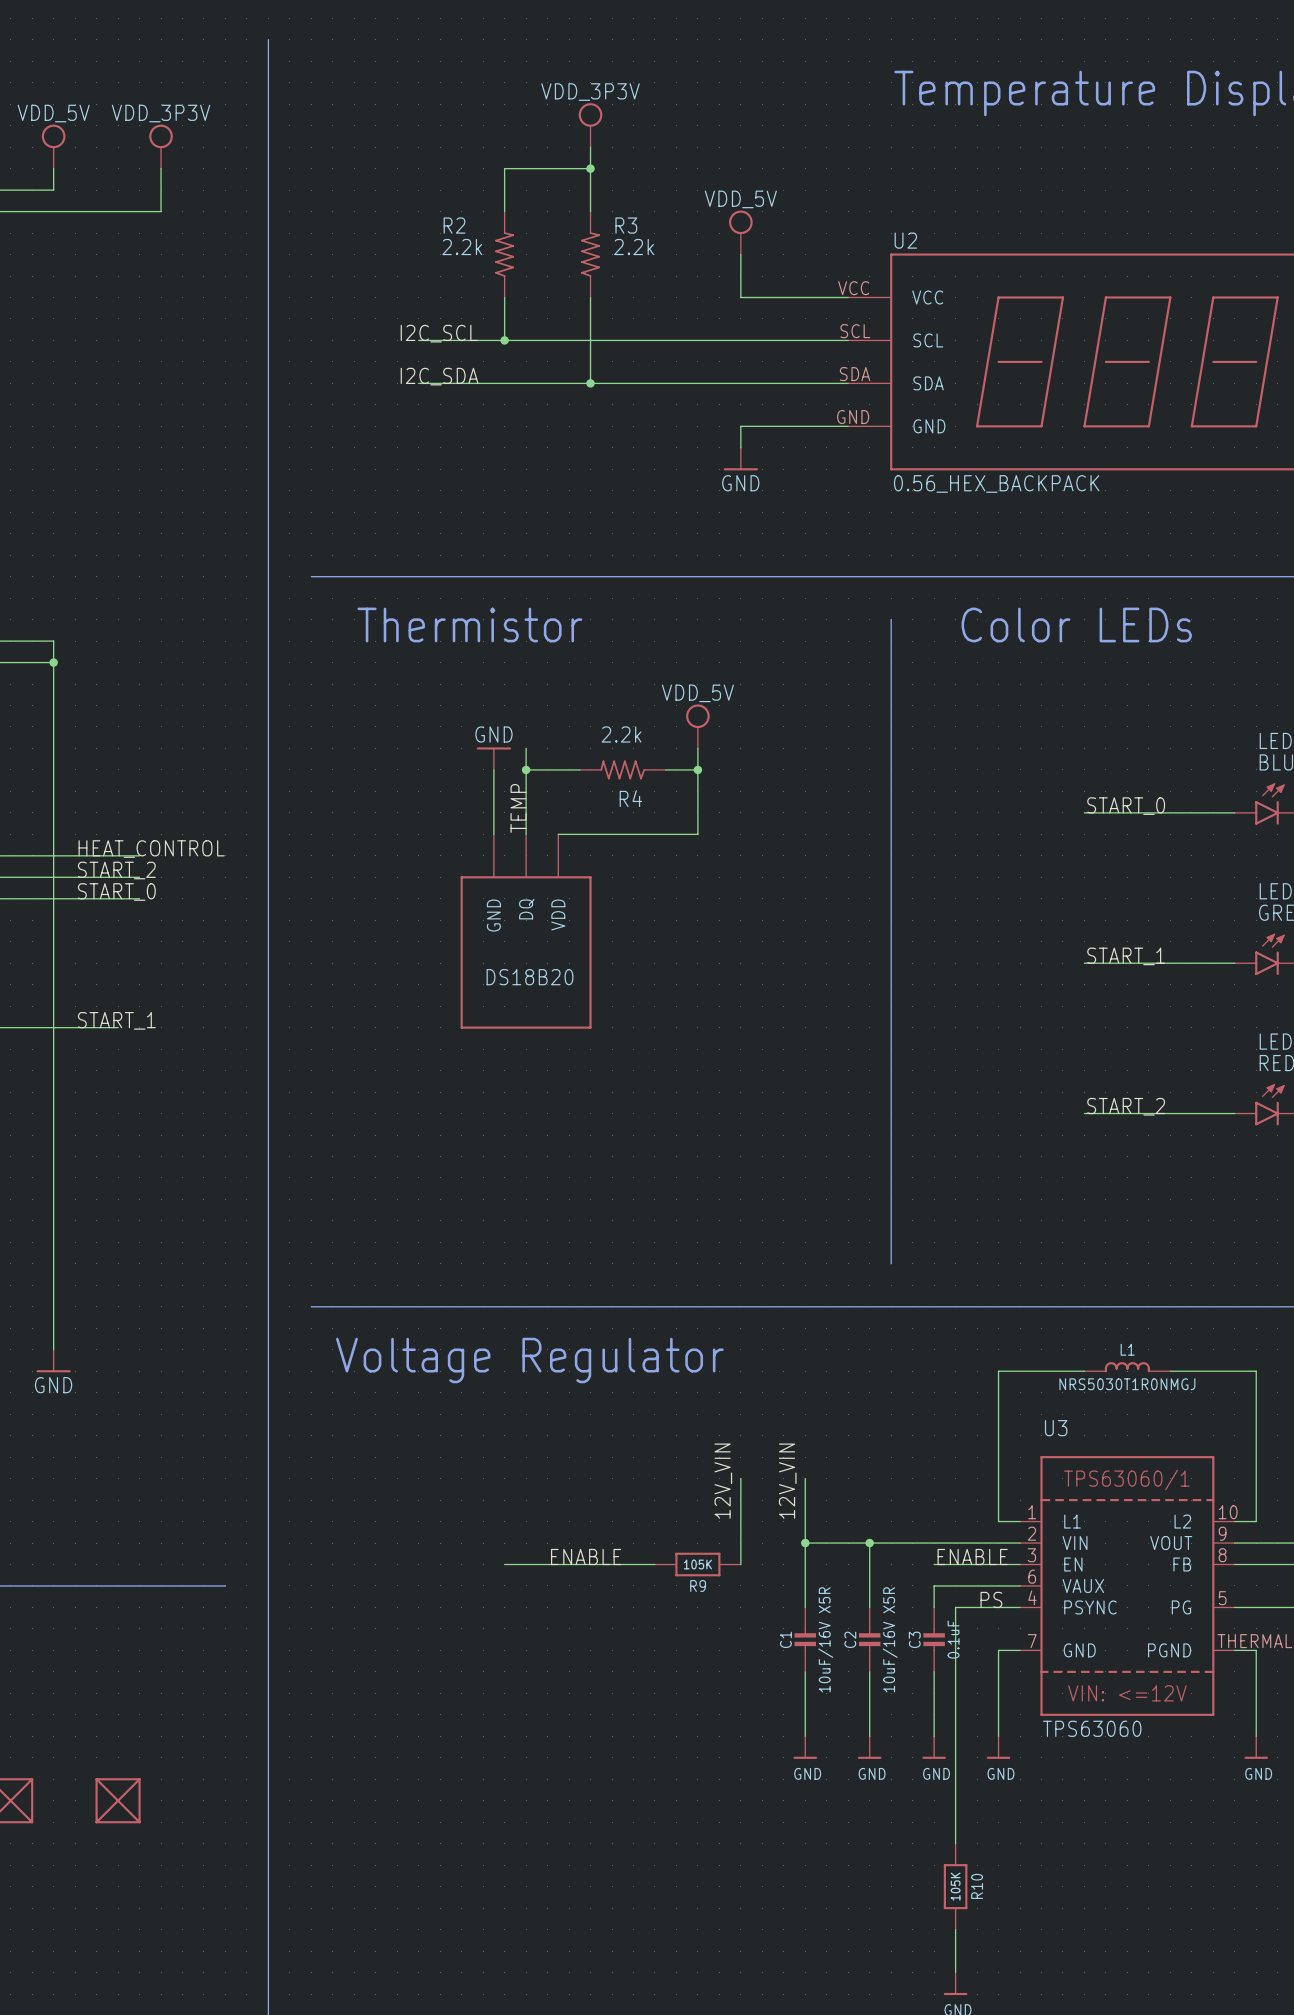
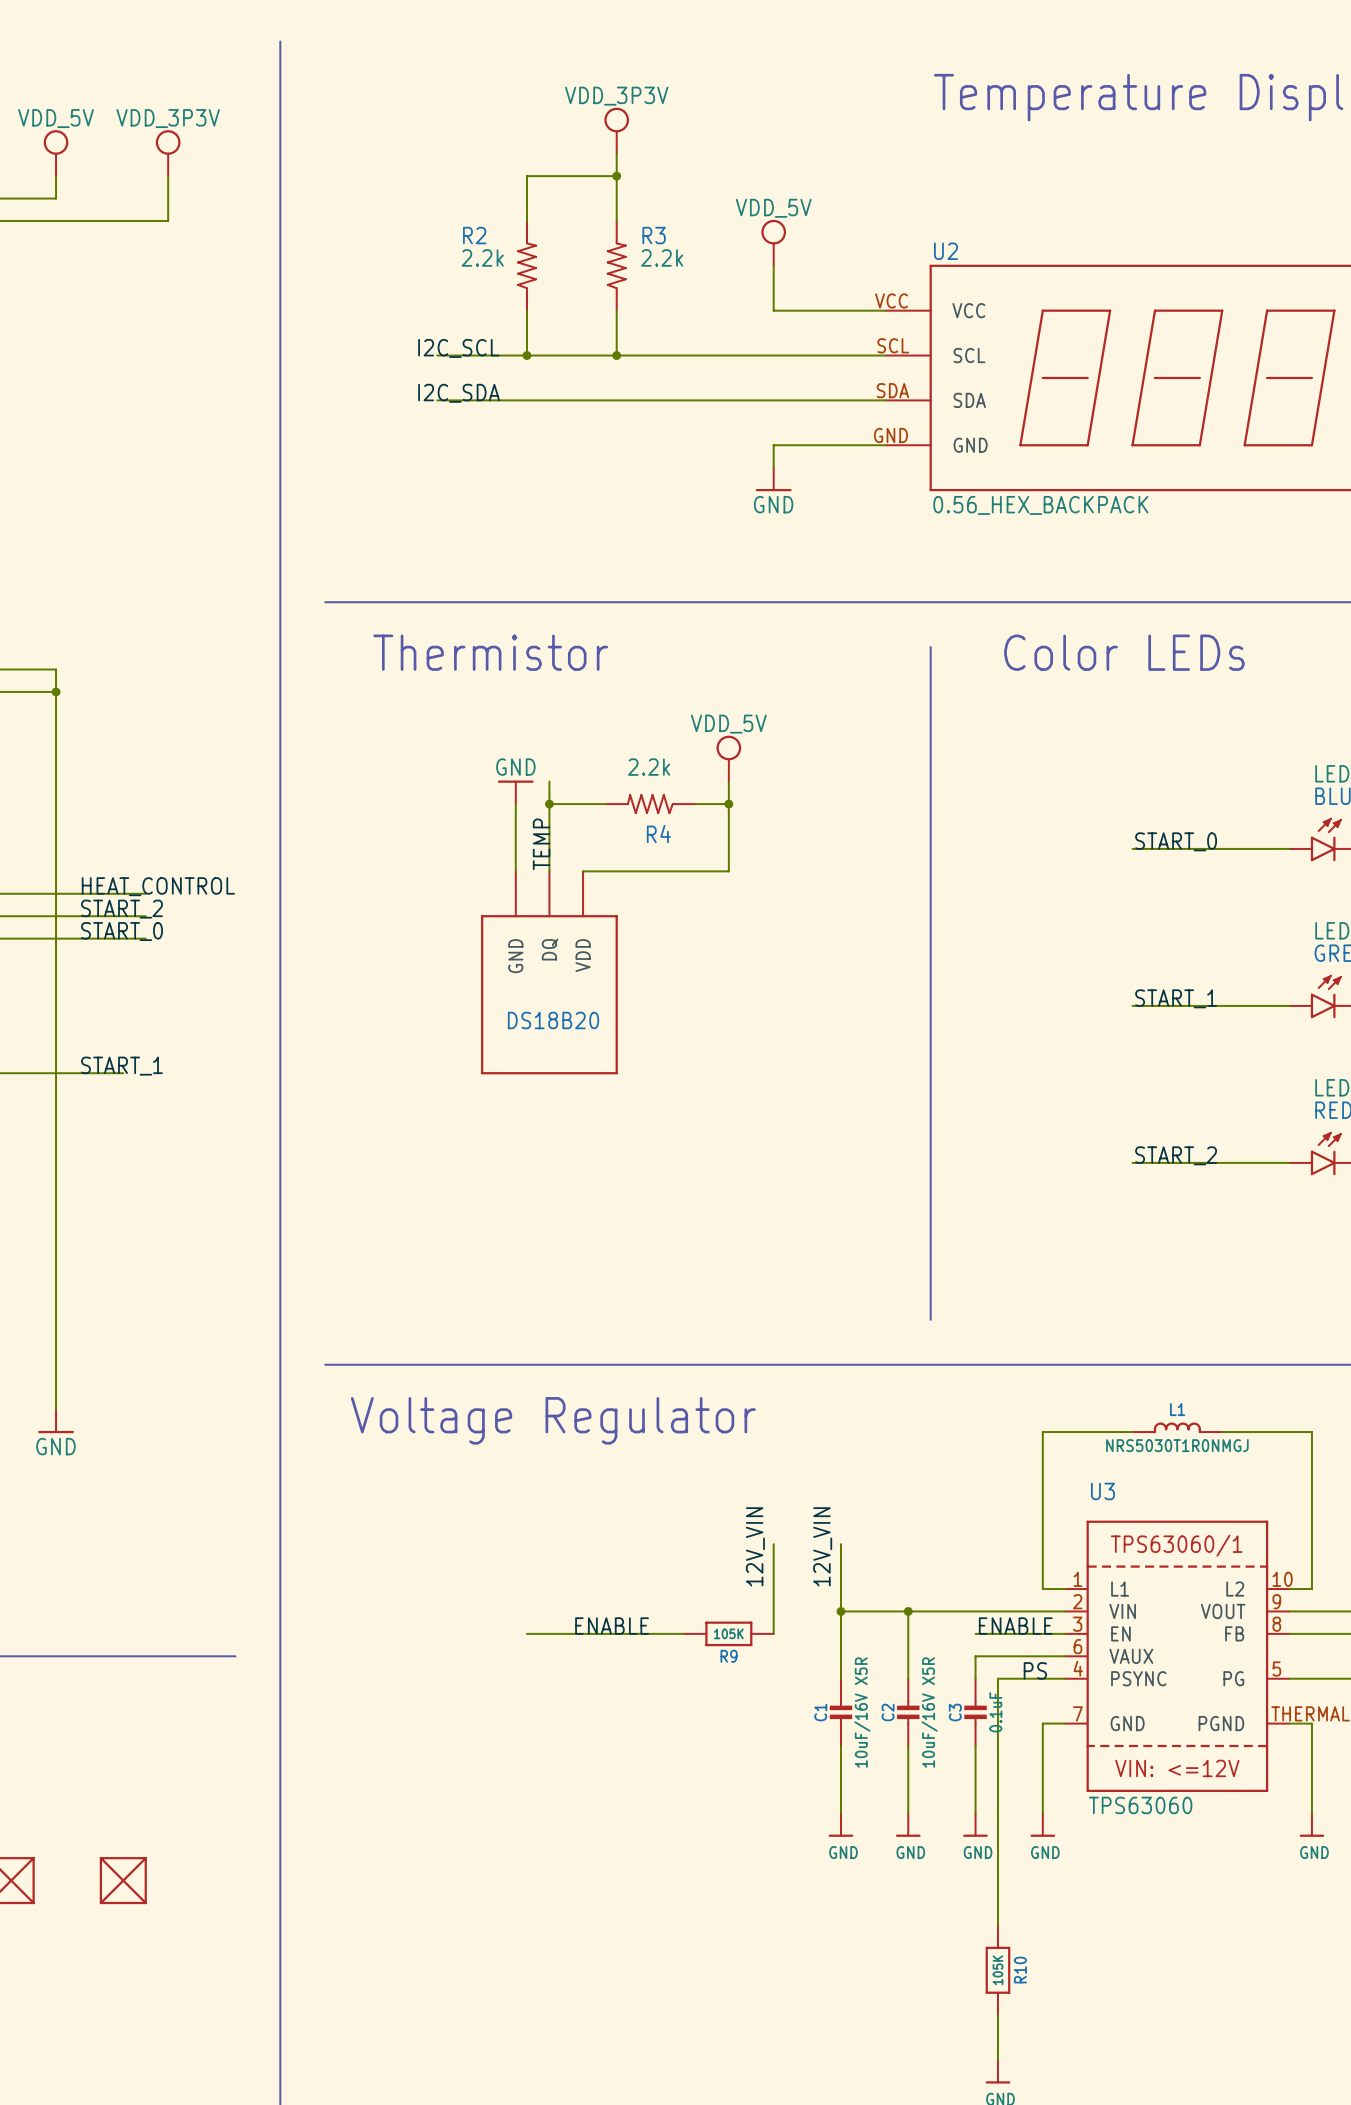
wire: (590, 340) (590, 383) -> none
junction position: (590, 383) -> (616, 355)

